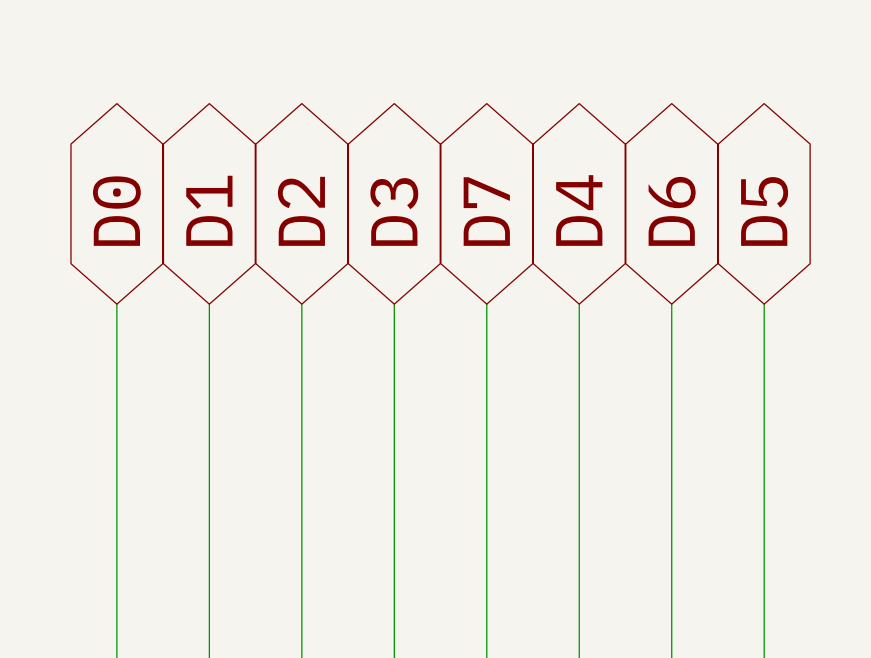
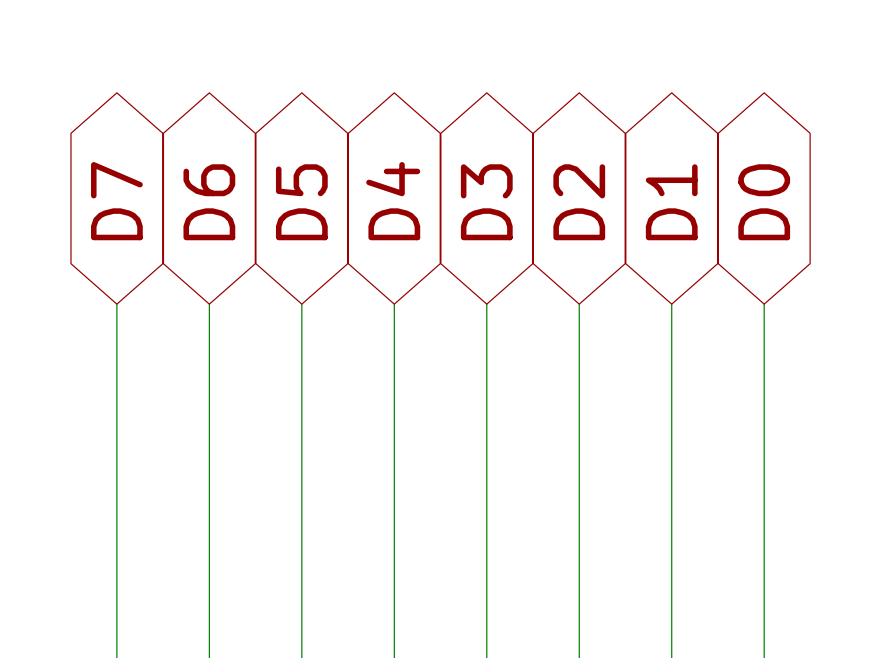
global label: D1 (209, 210) -> D6 (209, 202)
global label: D4 (579, 210) -> D2 (579, 202)
global label: D0 (116, 211) -> D7 (116, 201)
global label: D2 (301, 211) -> D5 (301, 202)
global label: D3 (394, 211) -> D4 (393, 201)
global label: D7 (486, 211) -> D3 (486, 202)
global label: D6 (672, 211) -> D1 (671, 202)
global label: D5 (764, 211) -> D0 (764, 202)

